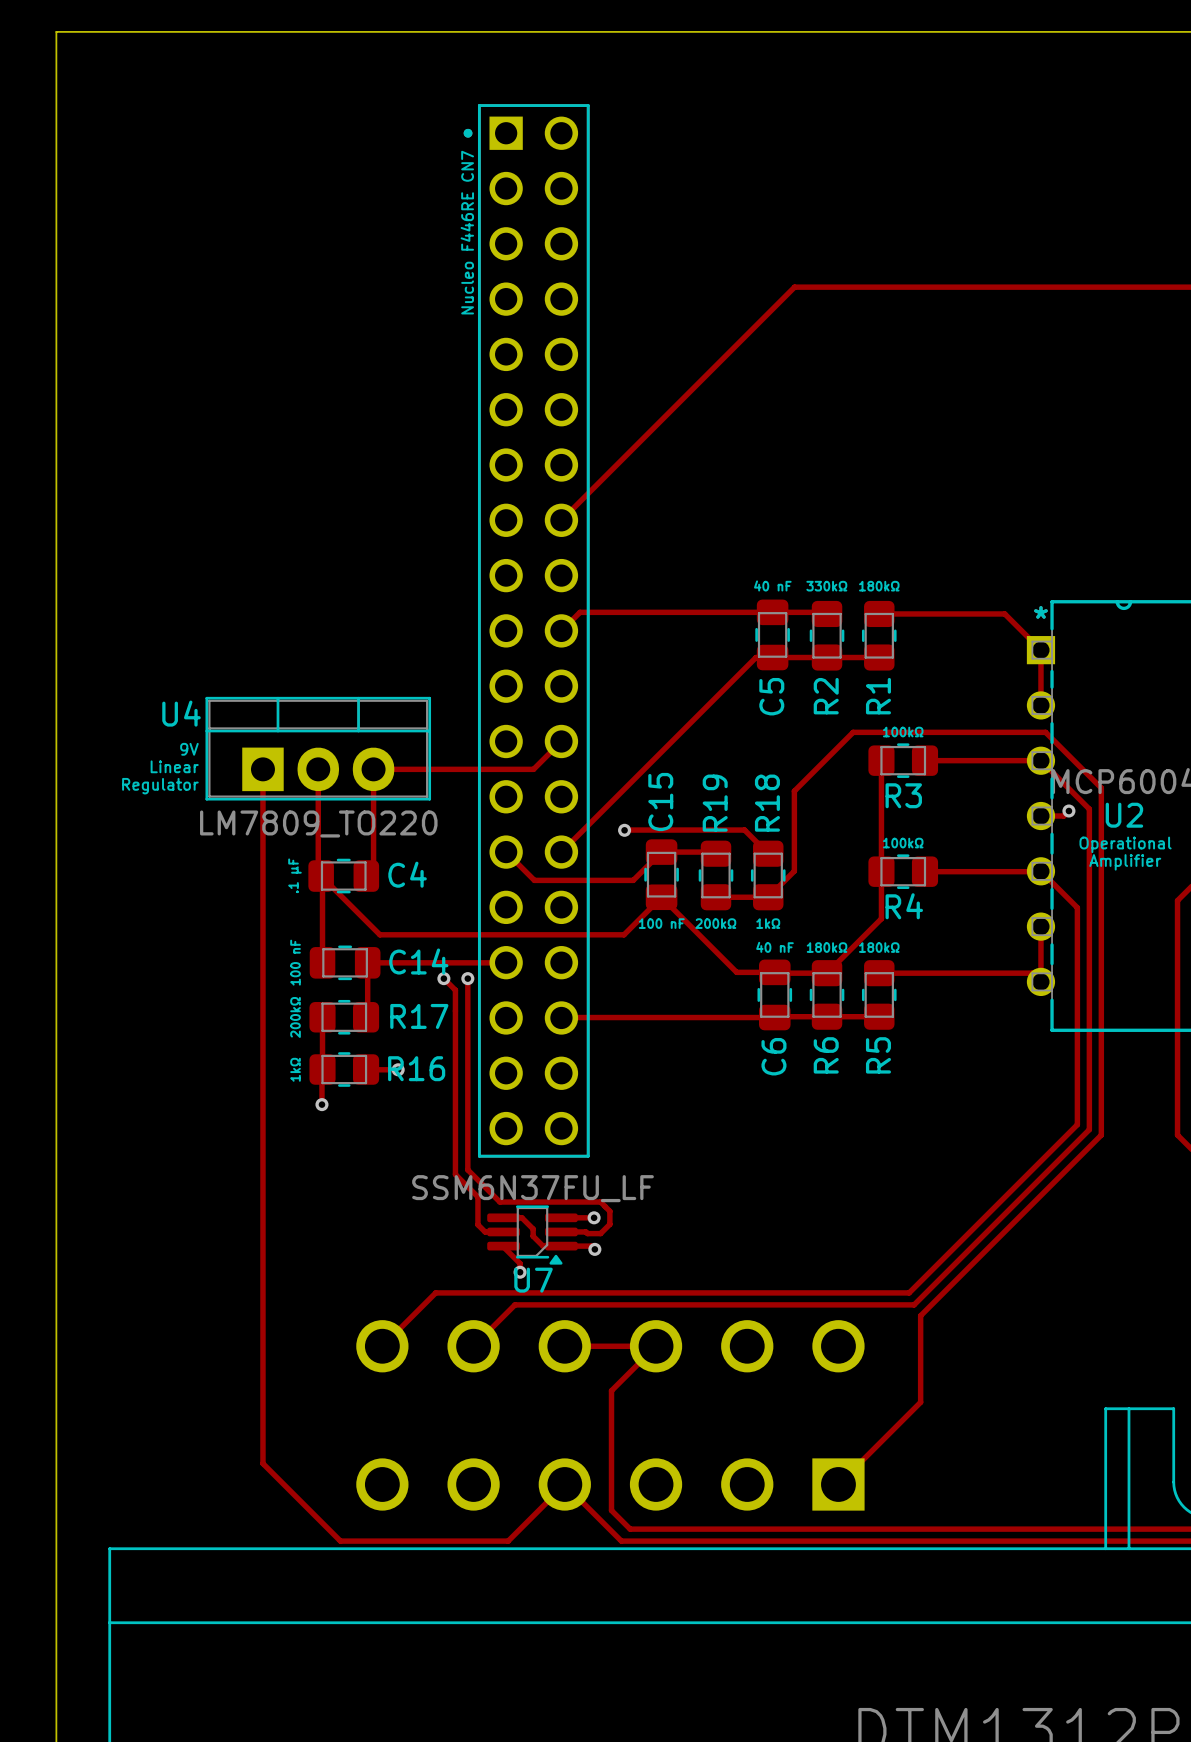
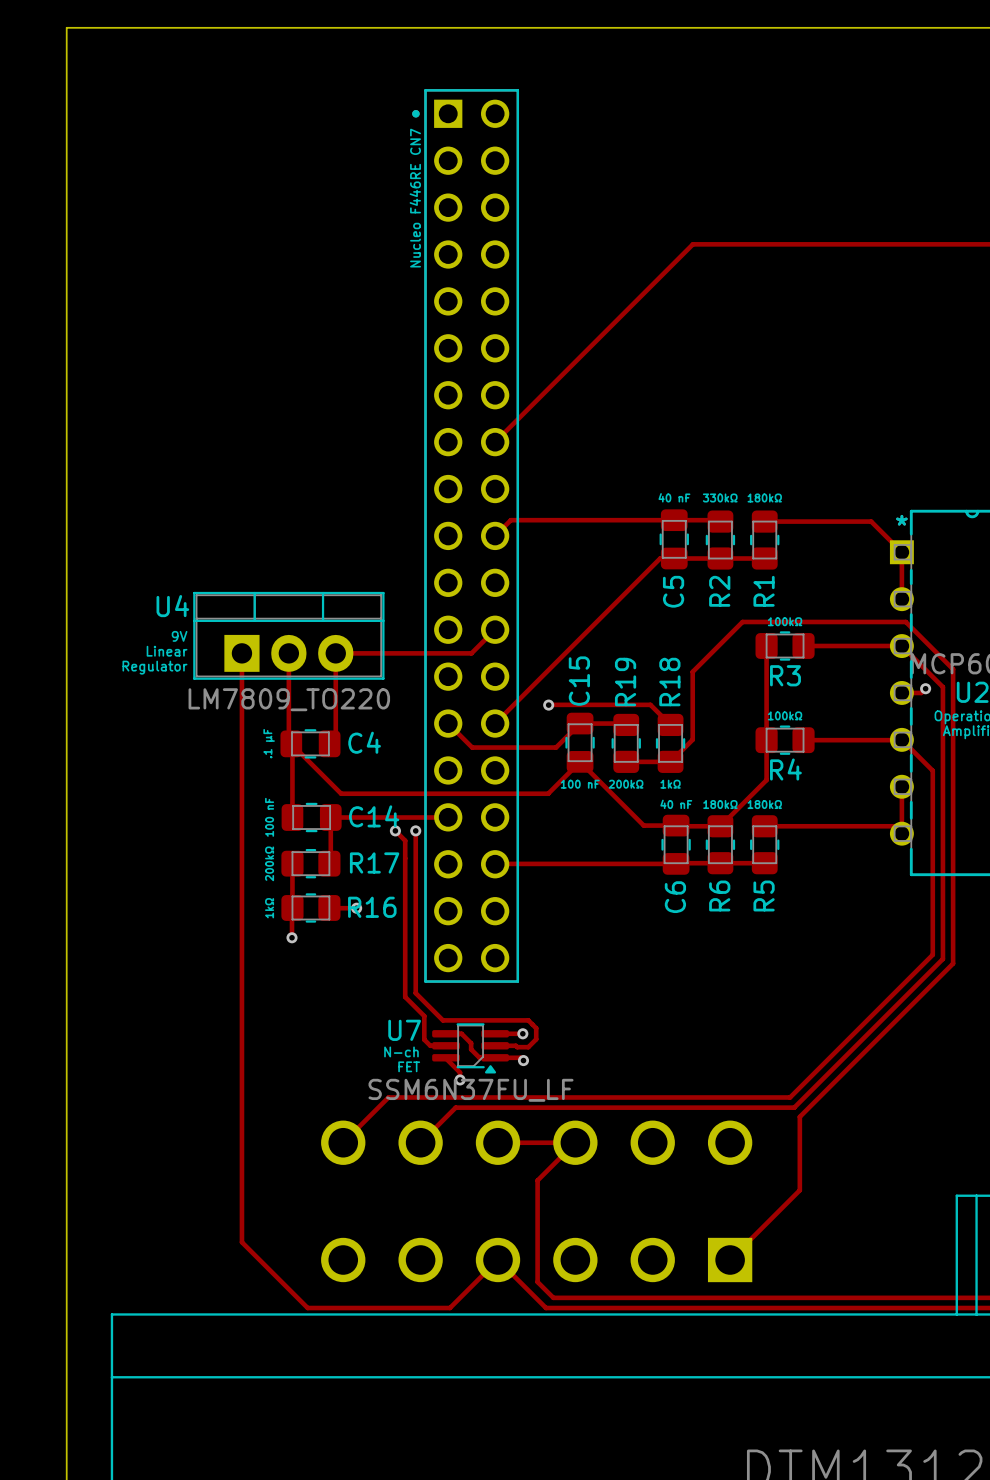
U7 value position: SSM6N37FU_LF (533, 1188) -> SSM6N37FU_LF (471, 1090)
text: none -> N-ch (401, 1051)
text: none -> FET (409, 1066)
U7 name position: U7 (533, 1280) -> U7 (404, 1030)

